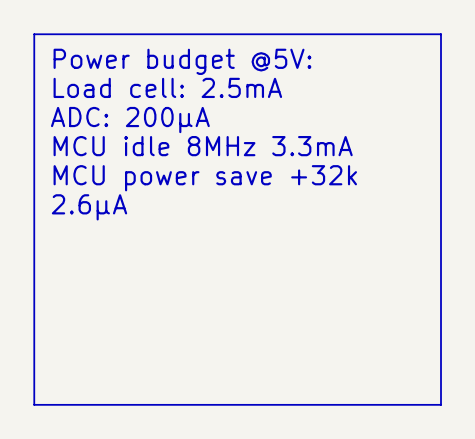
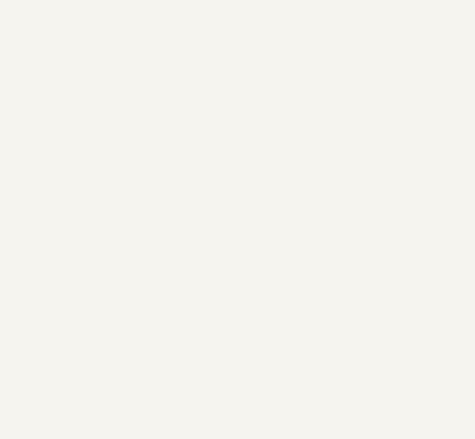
line: (34, 34) (441, 34) (441, 404) (34, 404) (34, 34) -> none
text: Power budget @5V: (182, 61) -> none
text: Load cell: 2.5mA (167, 87) -> none
text: ADC: 200µA (130, 120) -> none
text: MCU idle 8MHz 3.3mA (203, 146) -> none
text: MCU power save +32k (205, 178) -> none
text: 2.6µA (89, 207) -> none

